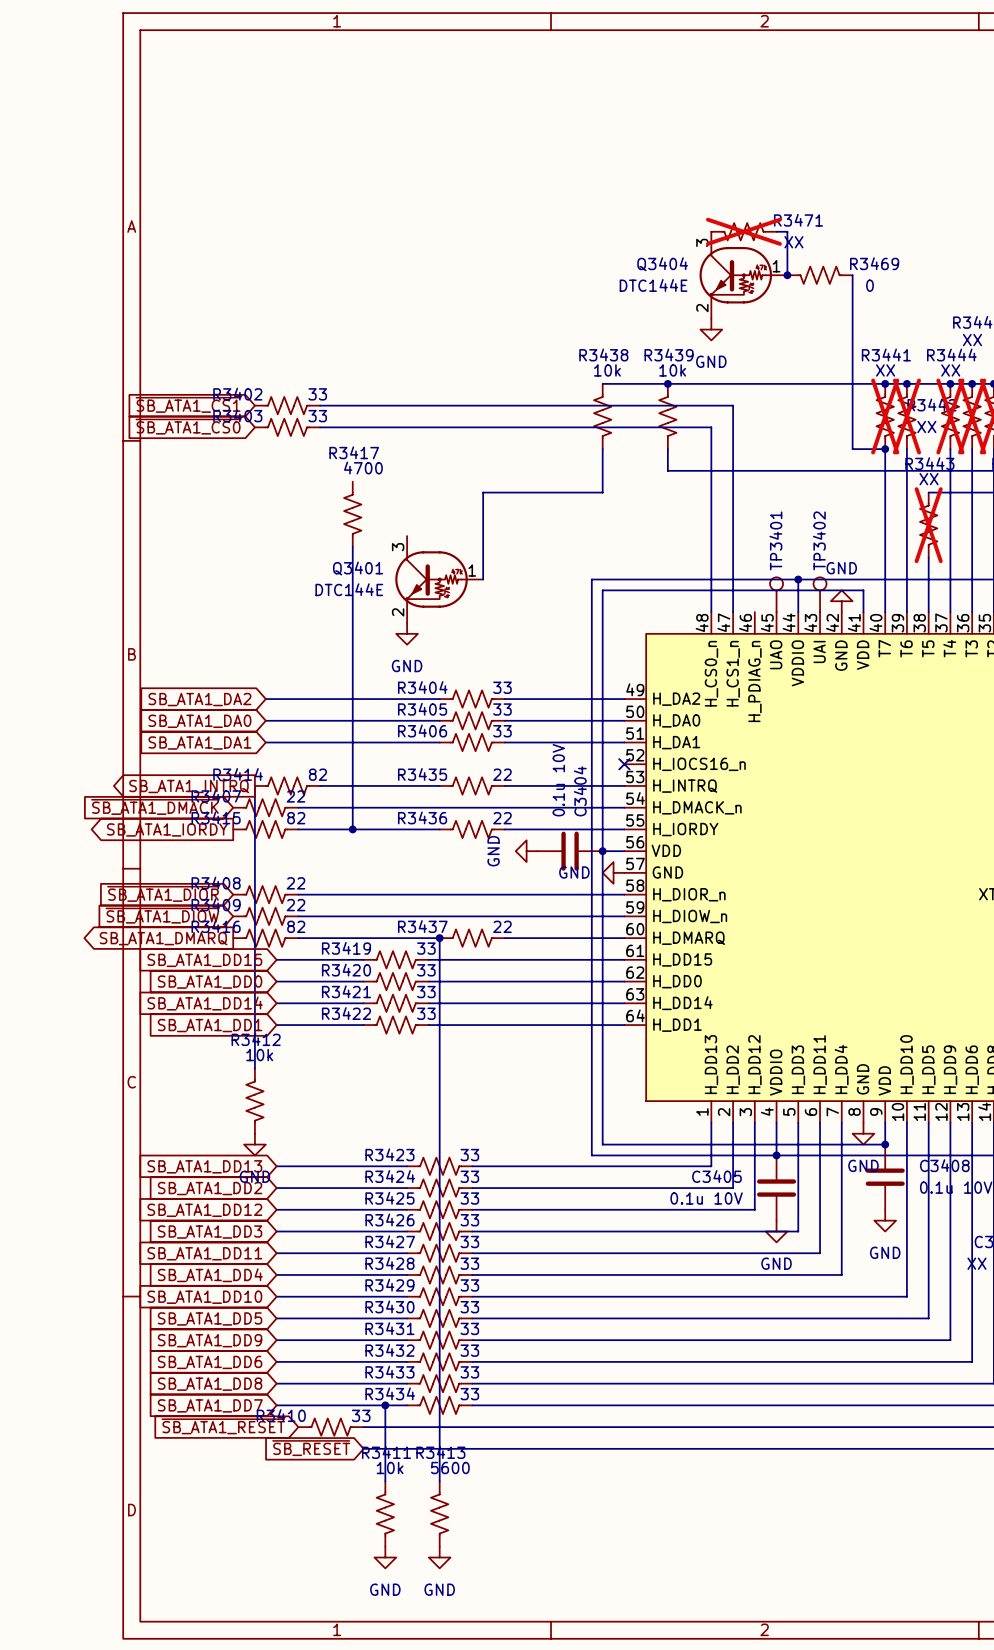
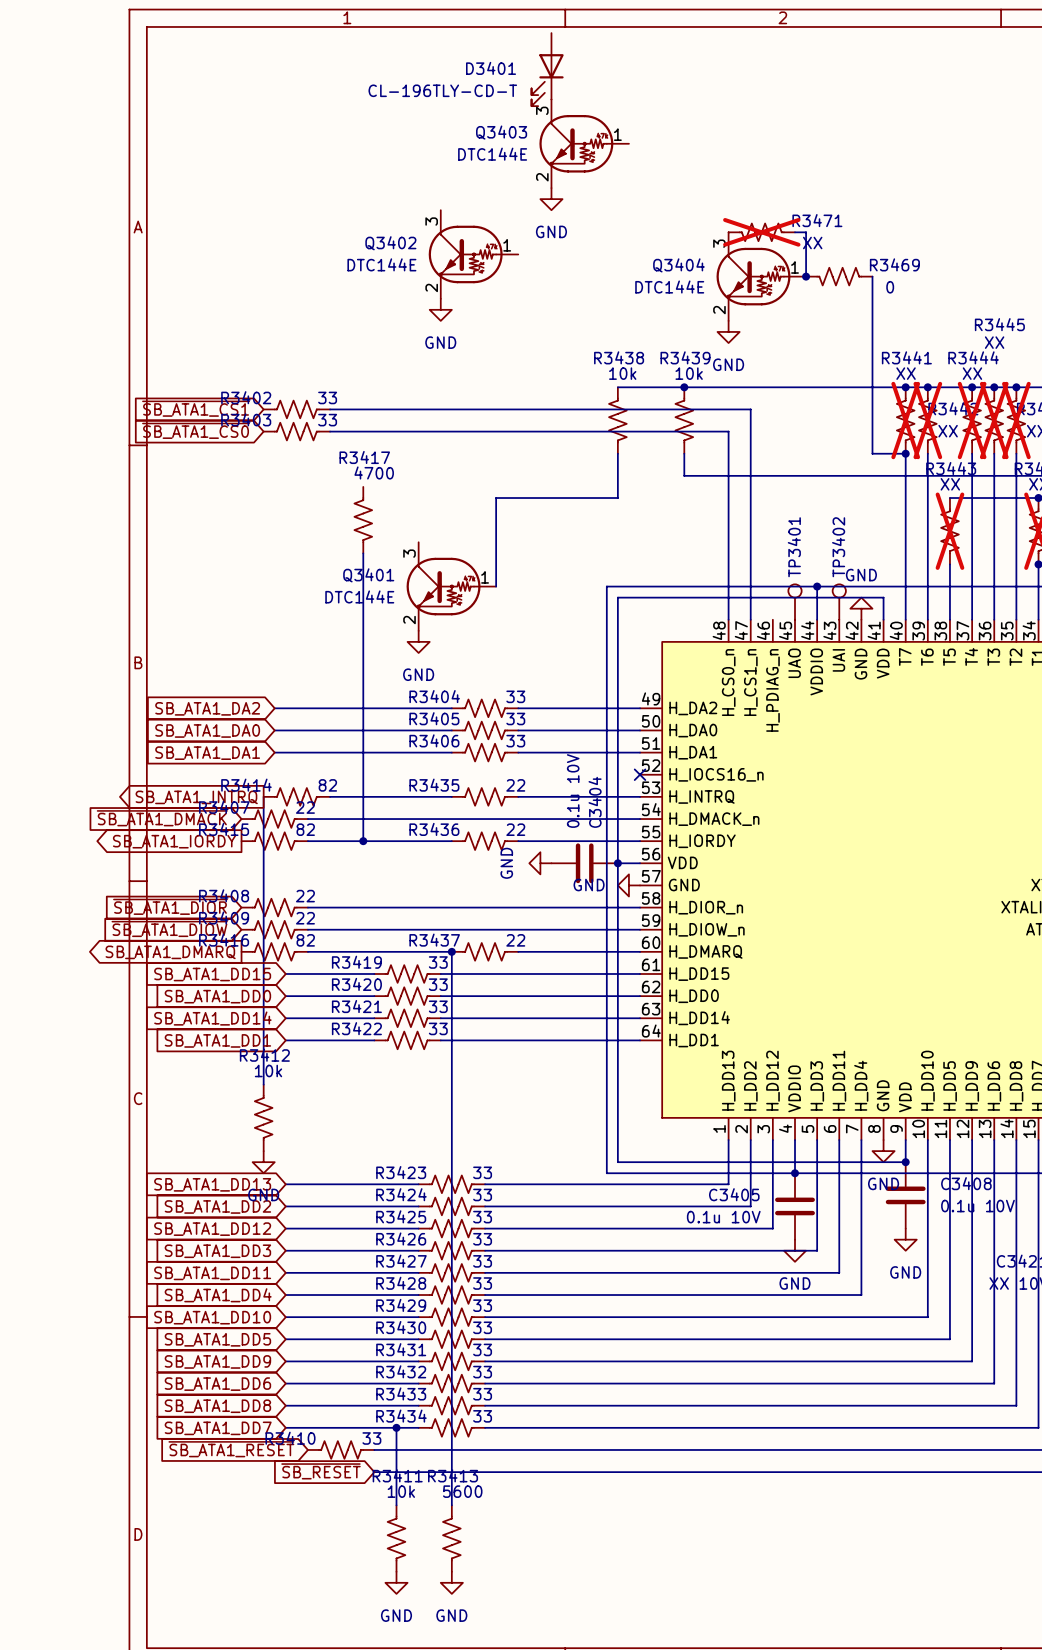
D3401: none -> CL-196TLY-CD-T (547, 69)
Q3403: none -> DTC144E (584, 143)
power symbol: none -> GND (551, 199)
Q3402: none -> DTC144E (473, 254)
power symbol: none -> GND (440, 309)

